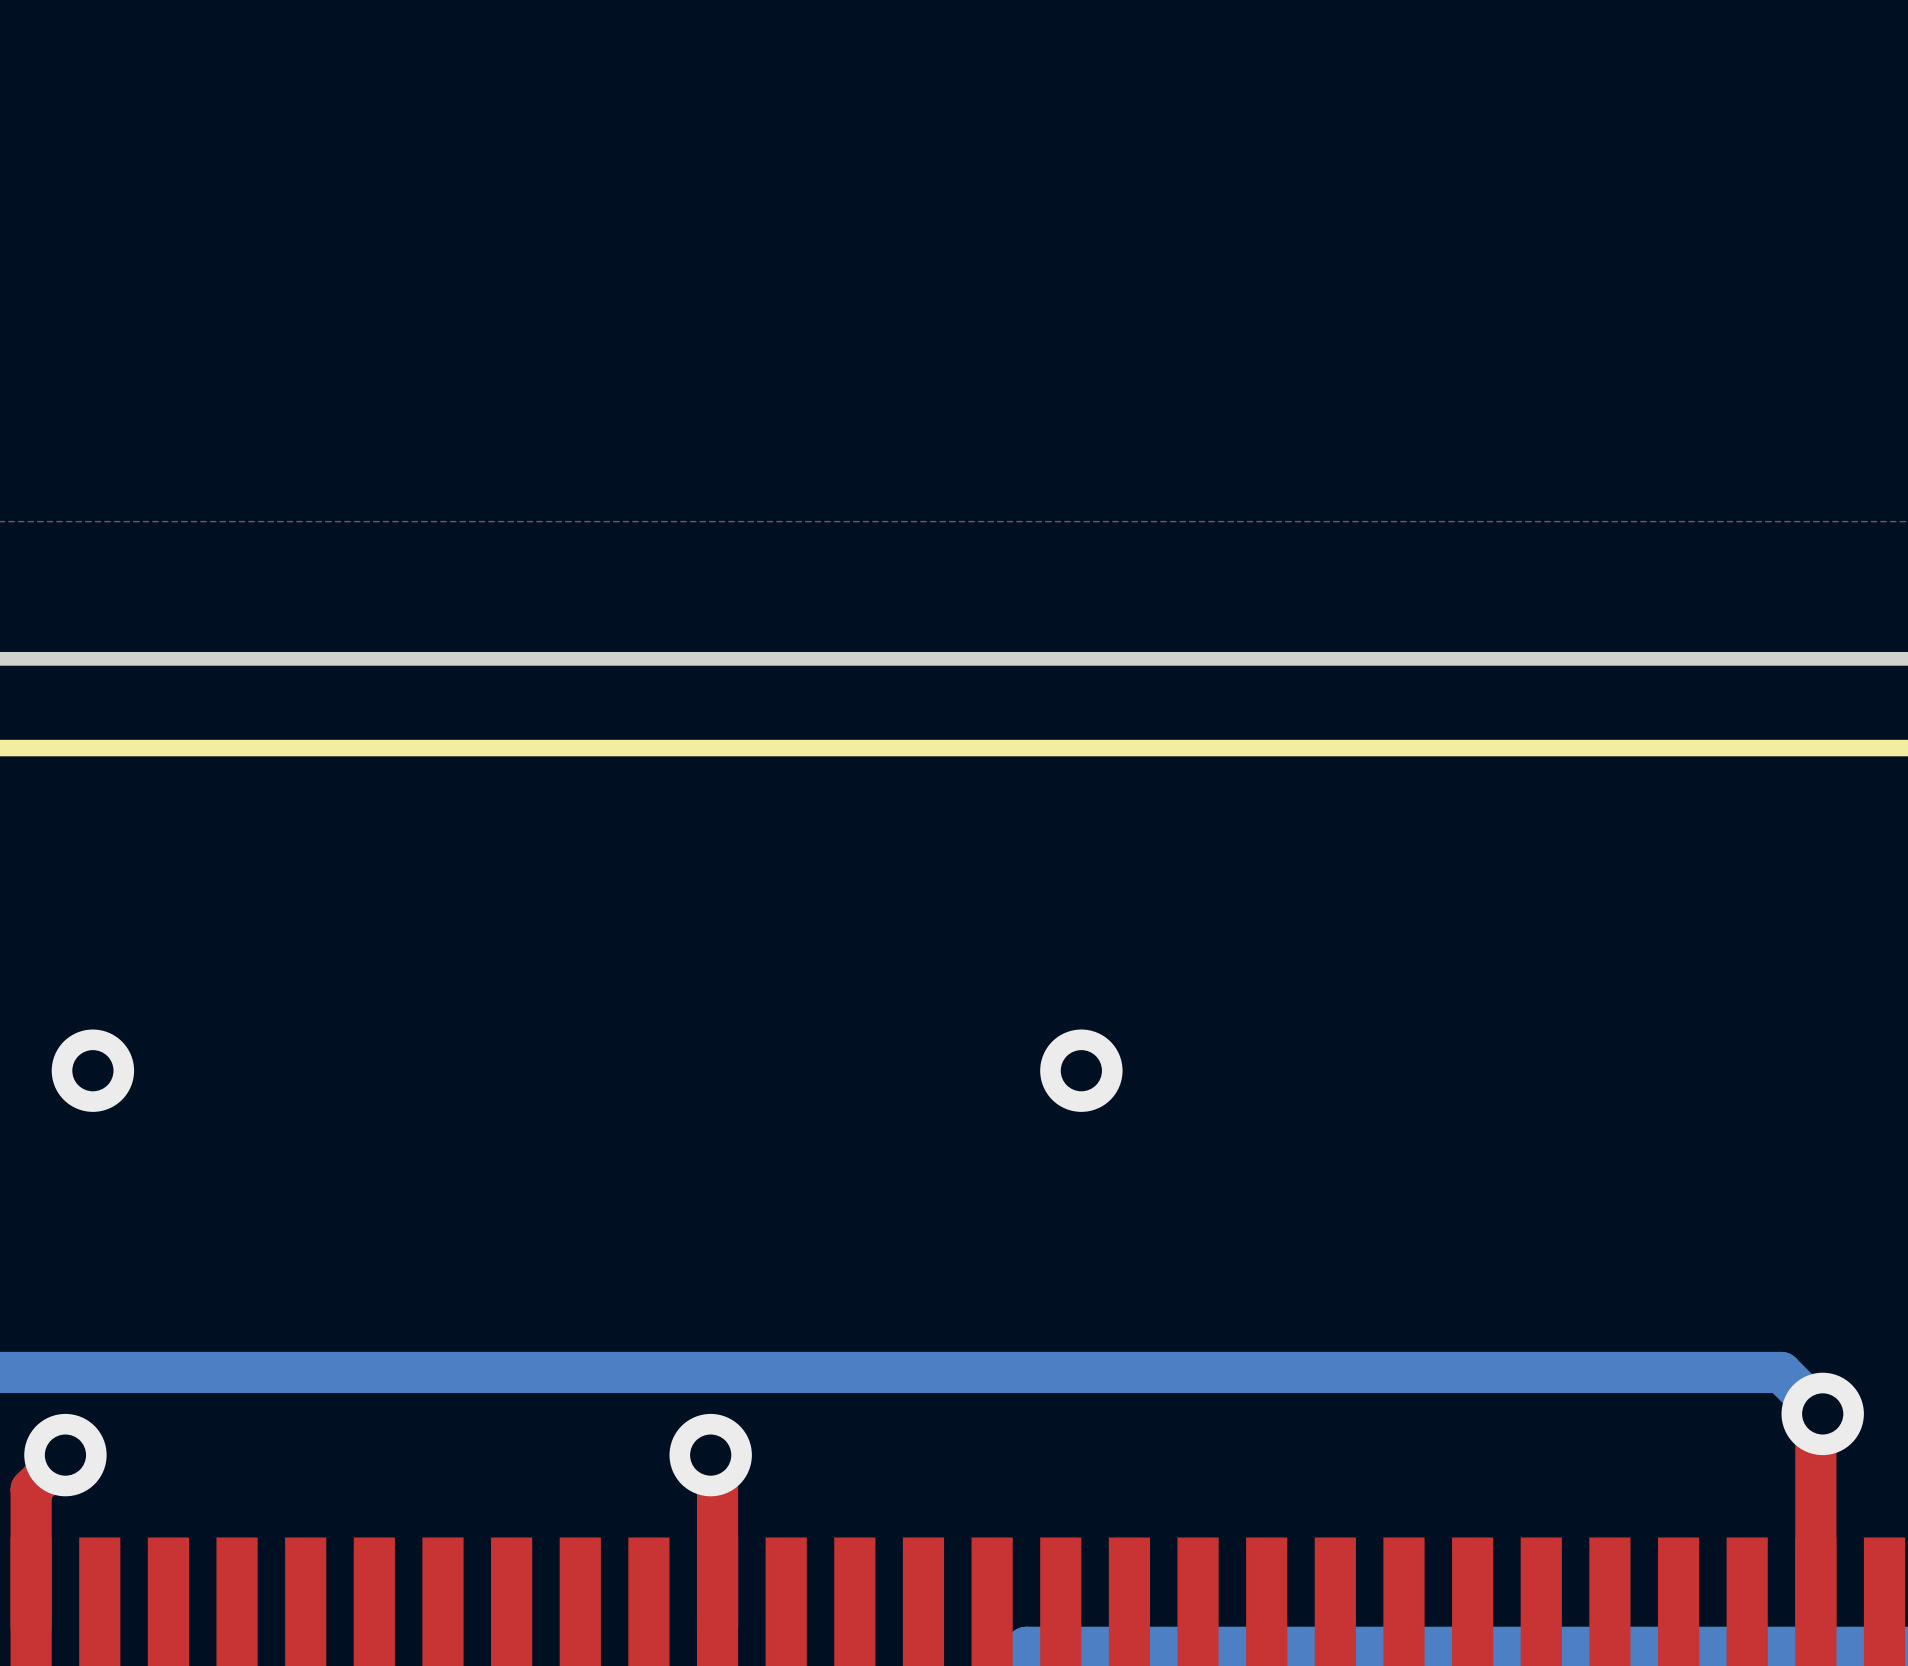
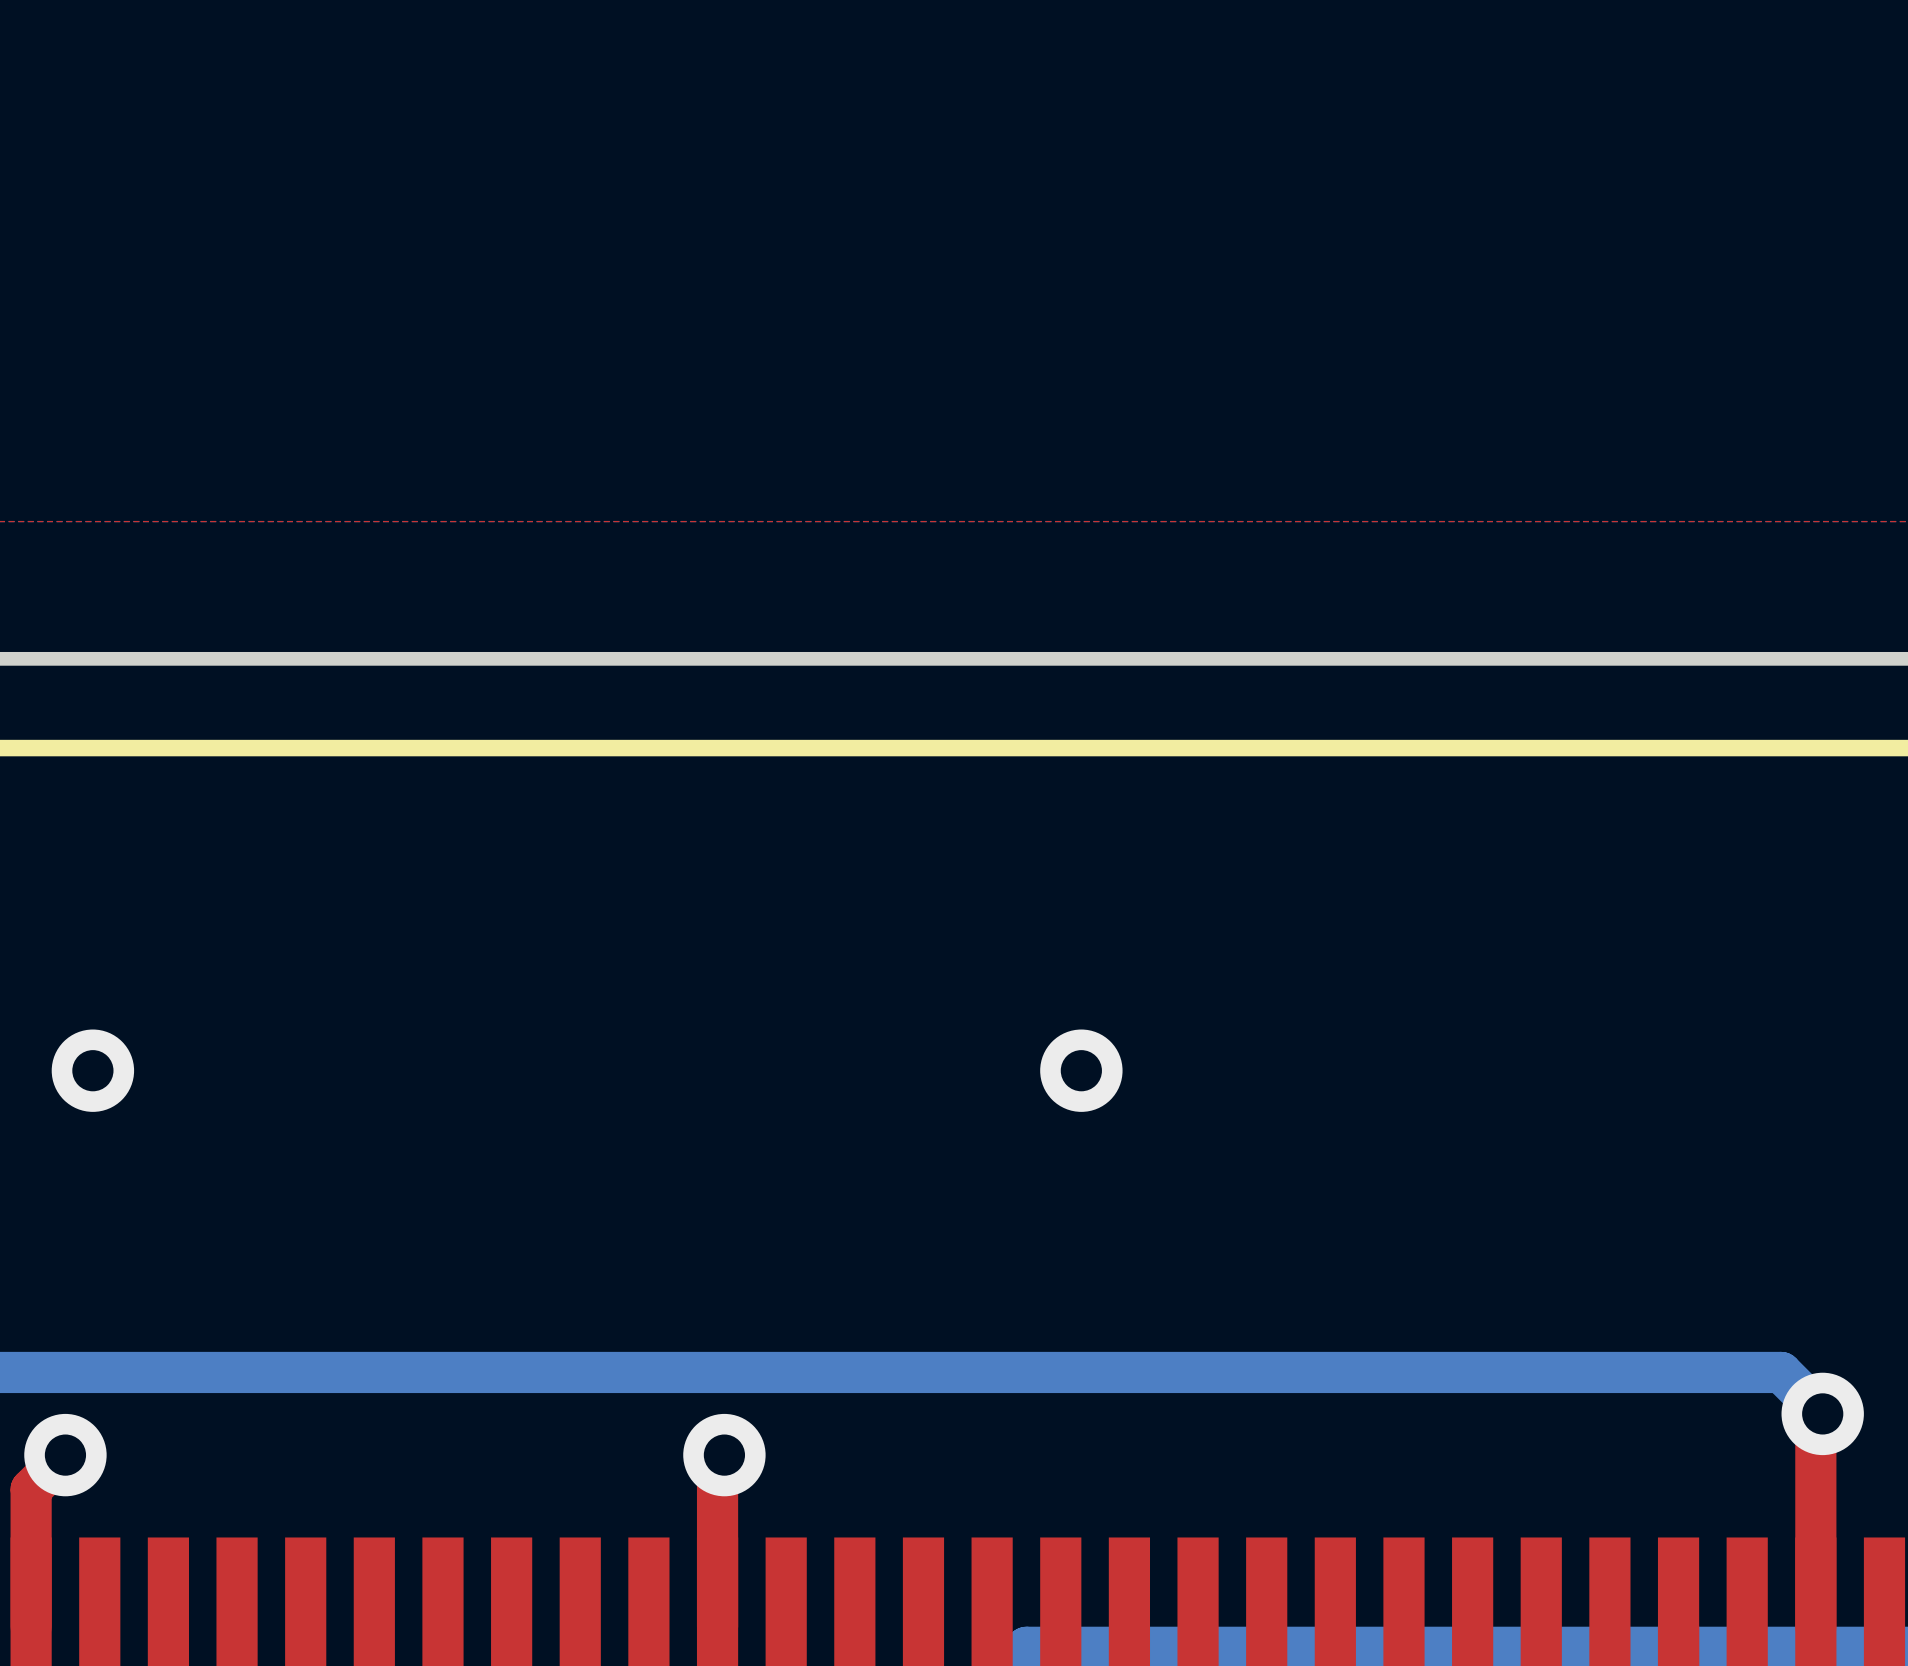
via position: (710, 1455) -> (724, 1455)

